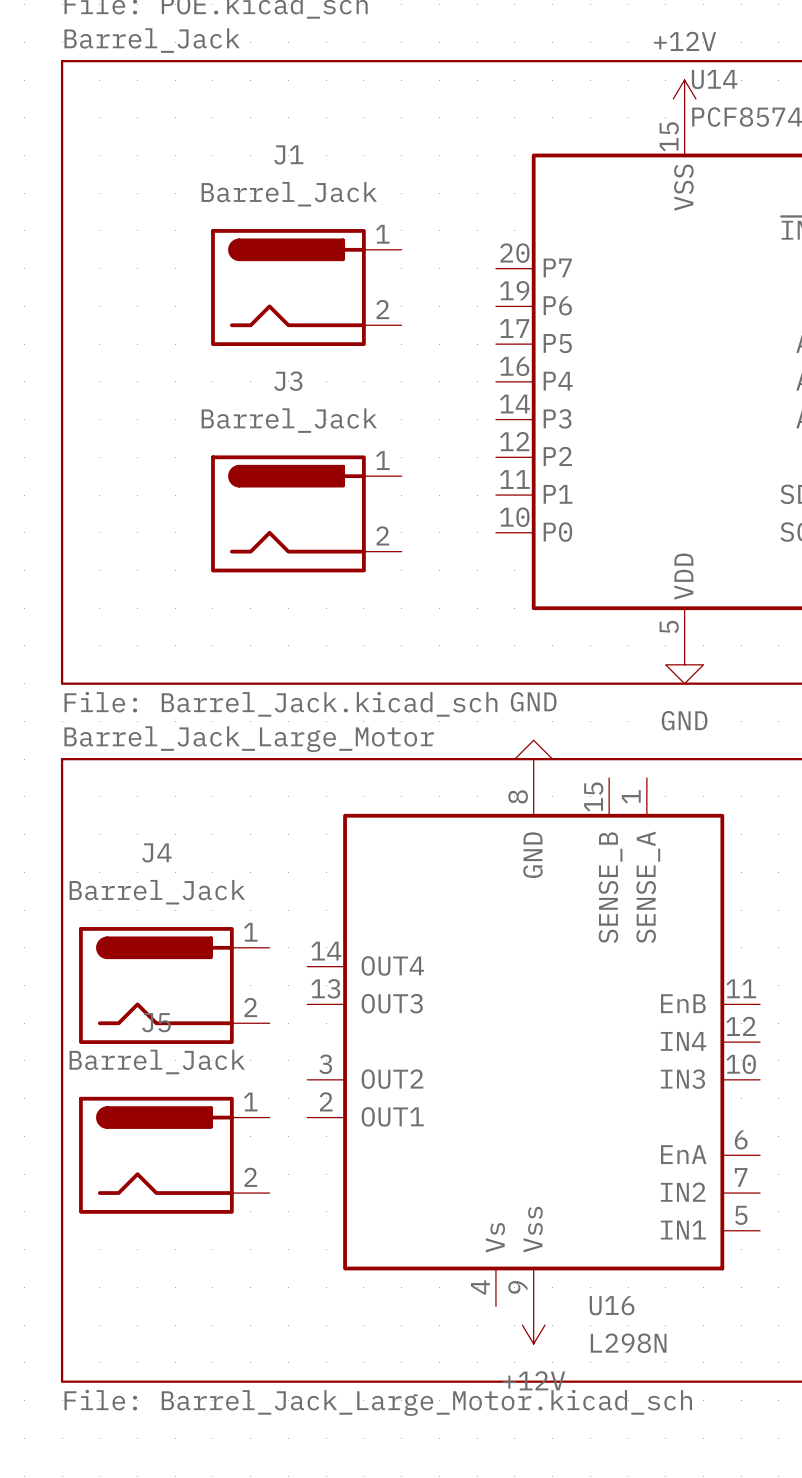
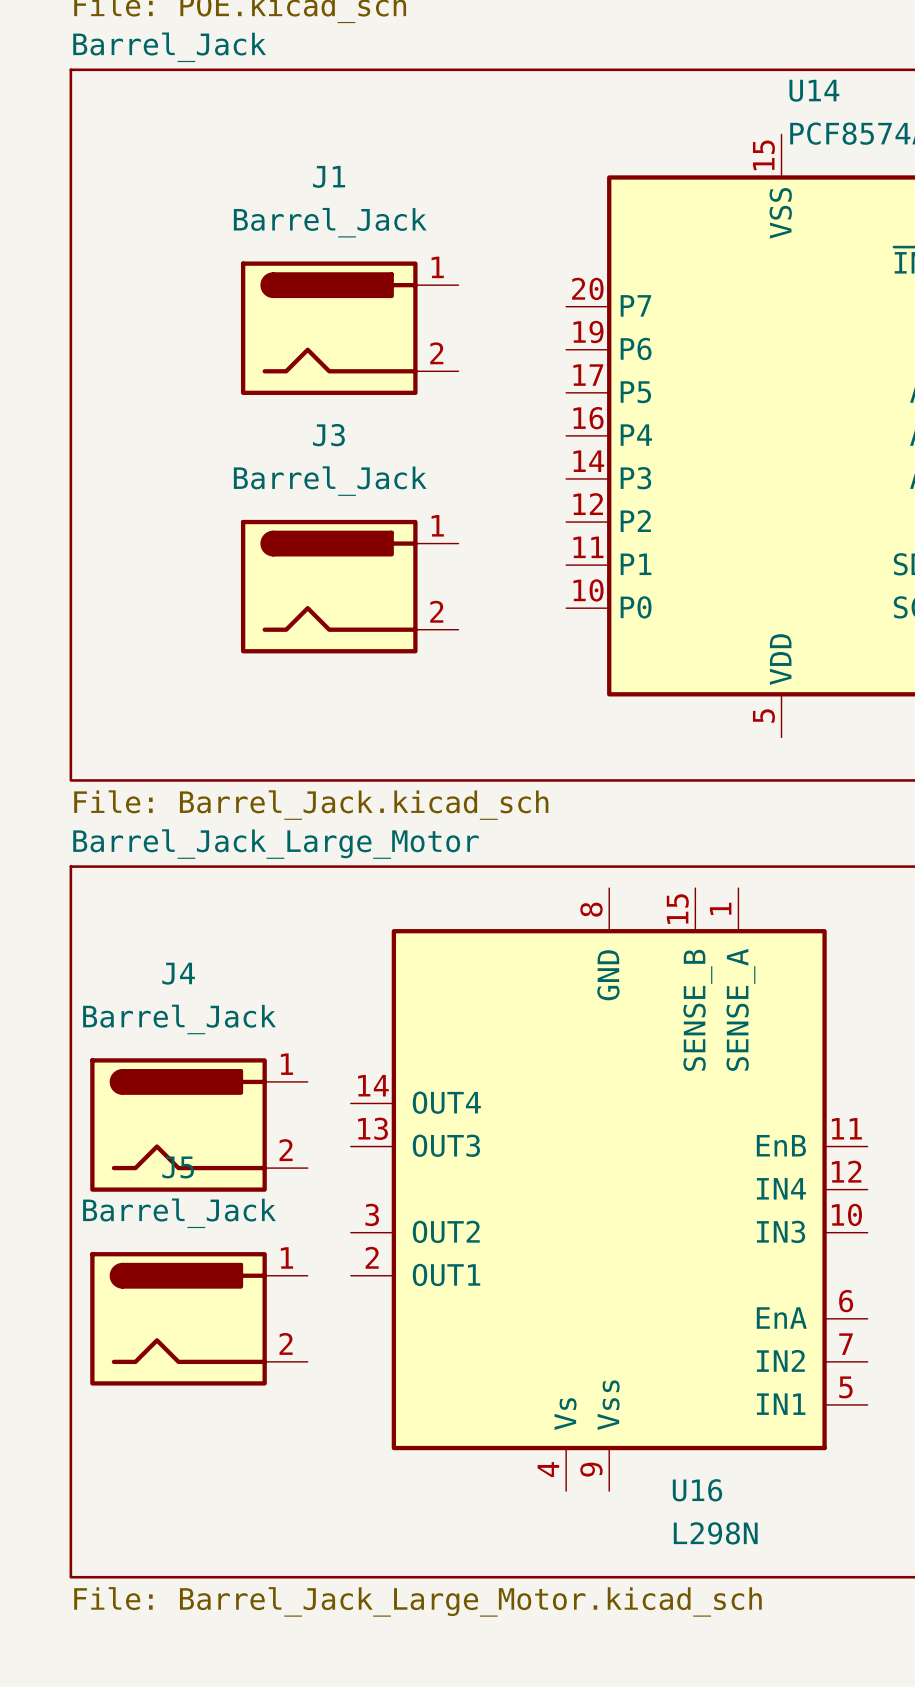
power symbol: +12V (684, 98) -> none
power symbol: GND (684, 664) -> none
power symbol: GND (533, 759) -> none
power symbol: +12V (533, 1325) -> none

